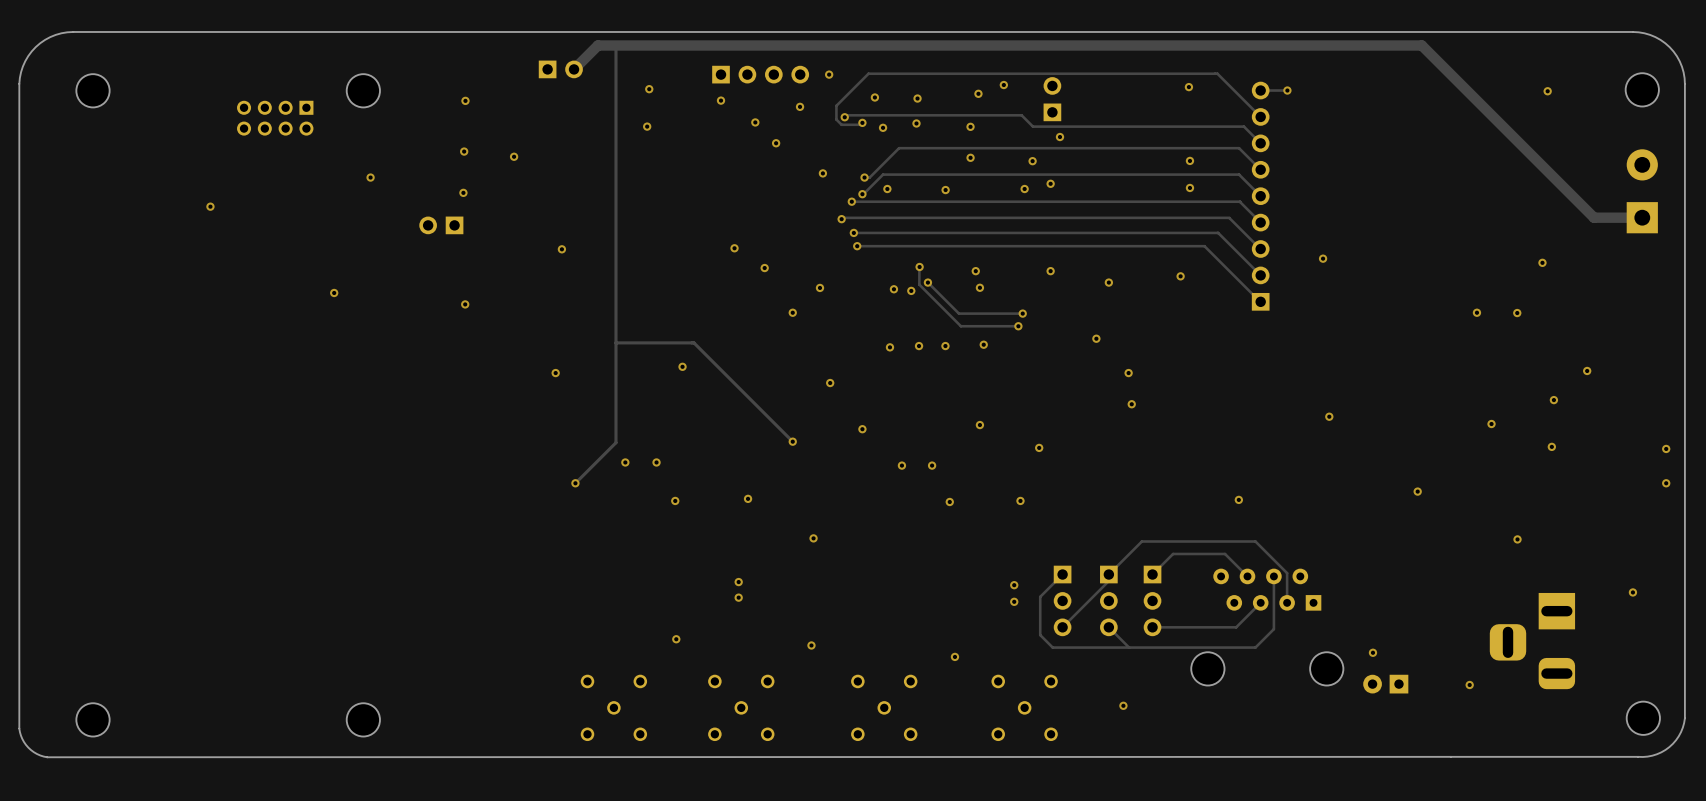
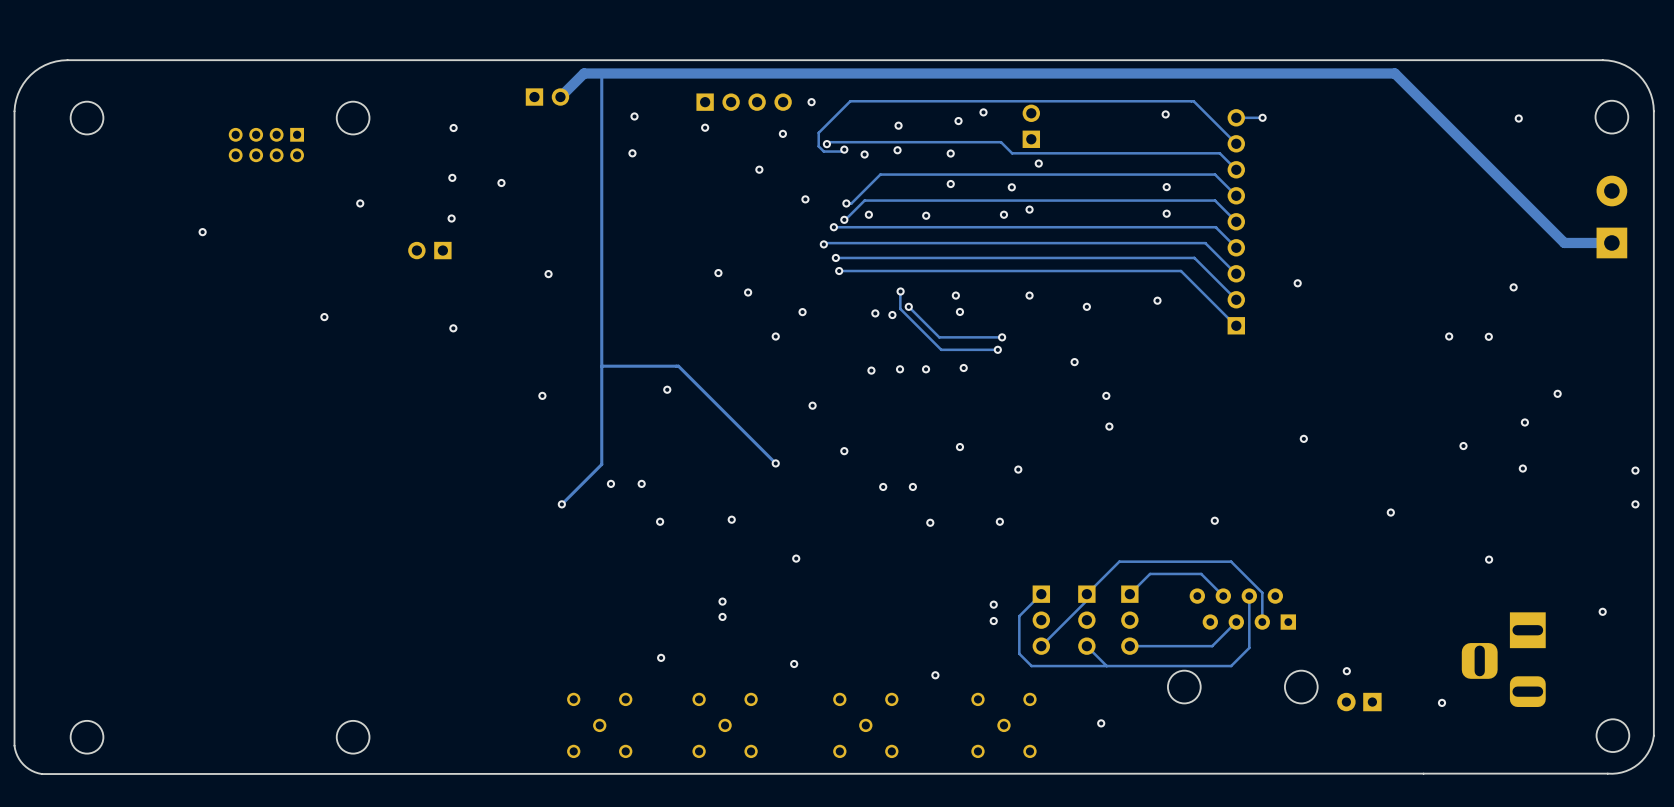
via: (874, 97) -> none
via: (755, 122) -> none

